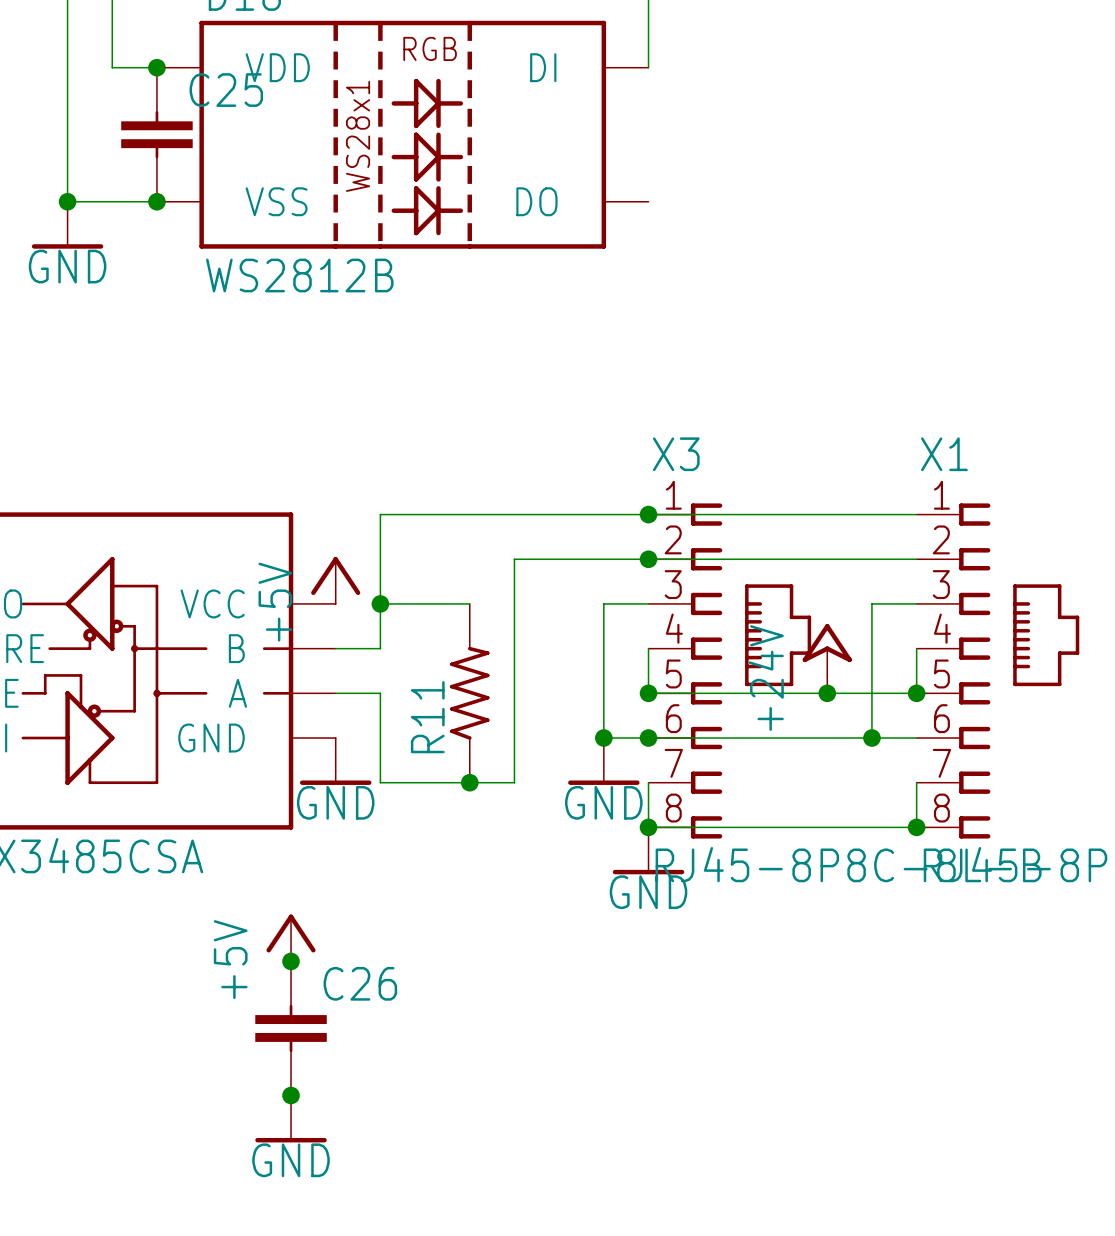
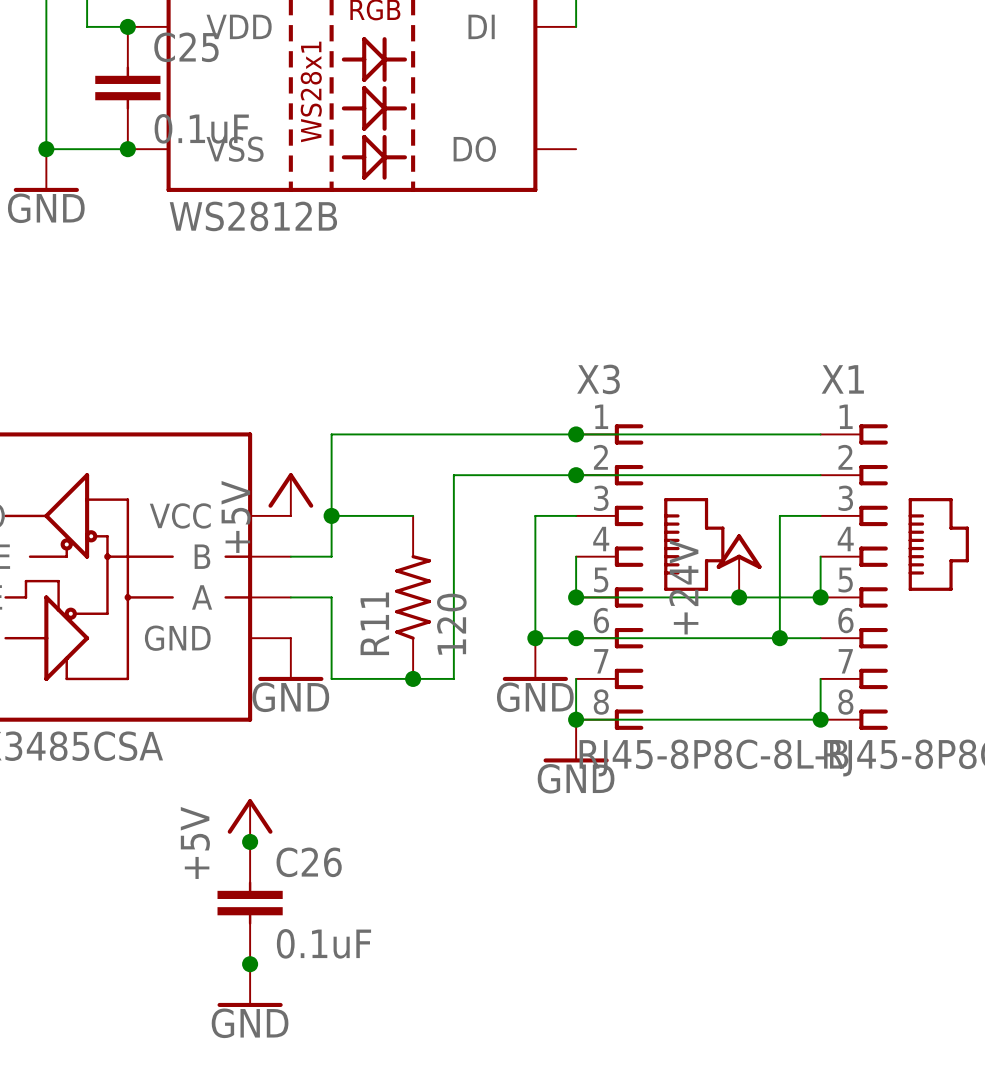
C25 value: none -> 0.1uF (201, 128)
R11 value: none -> 120 (451, 624)
C26 value: none -> 0.1uF (323, 943)

